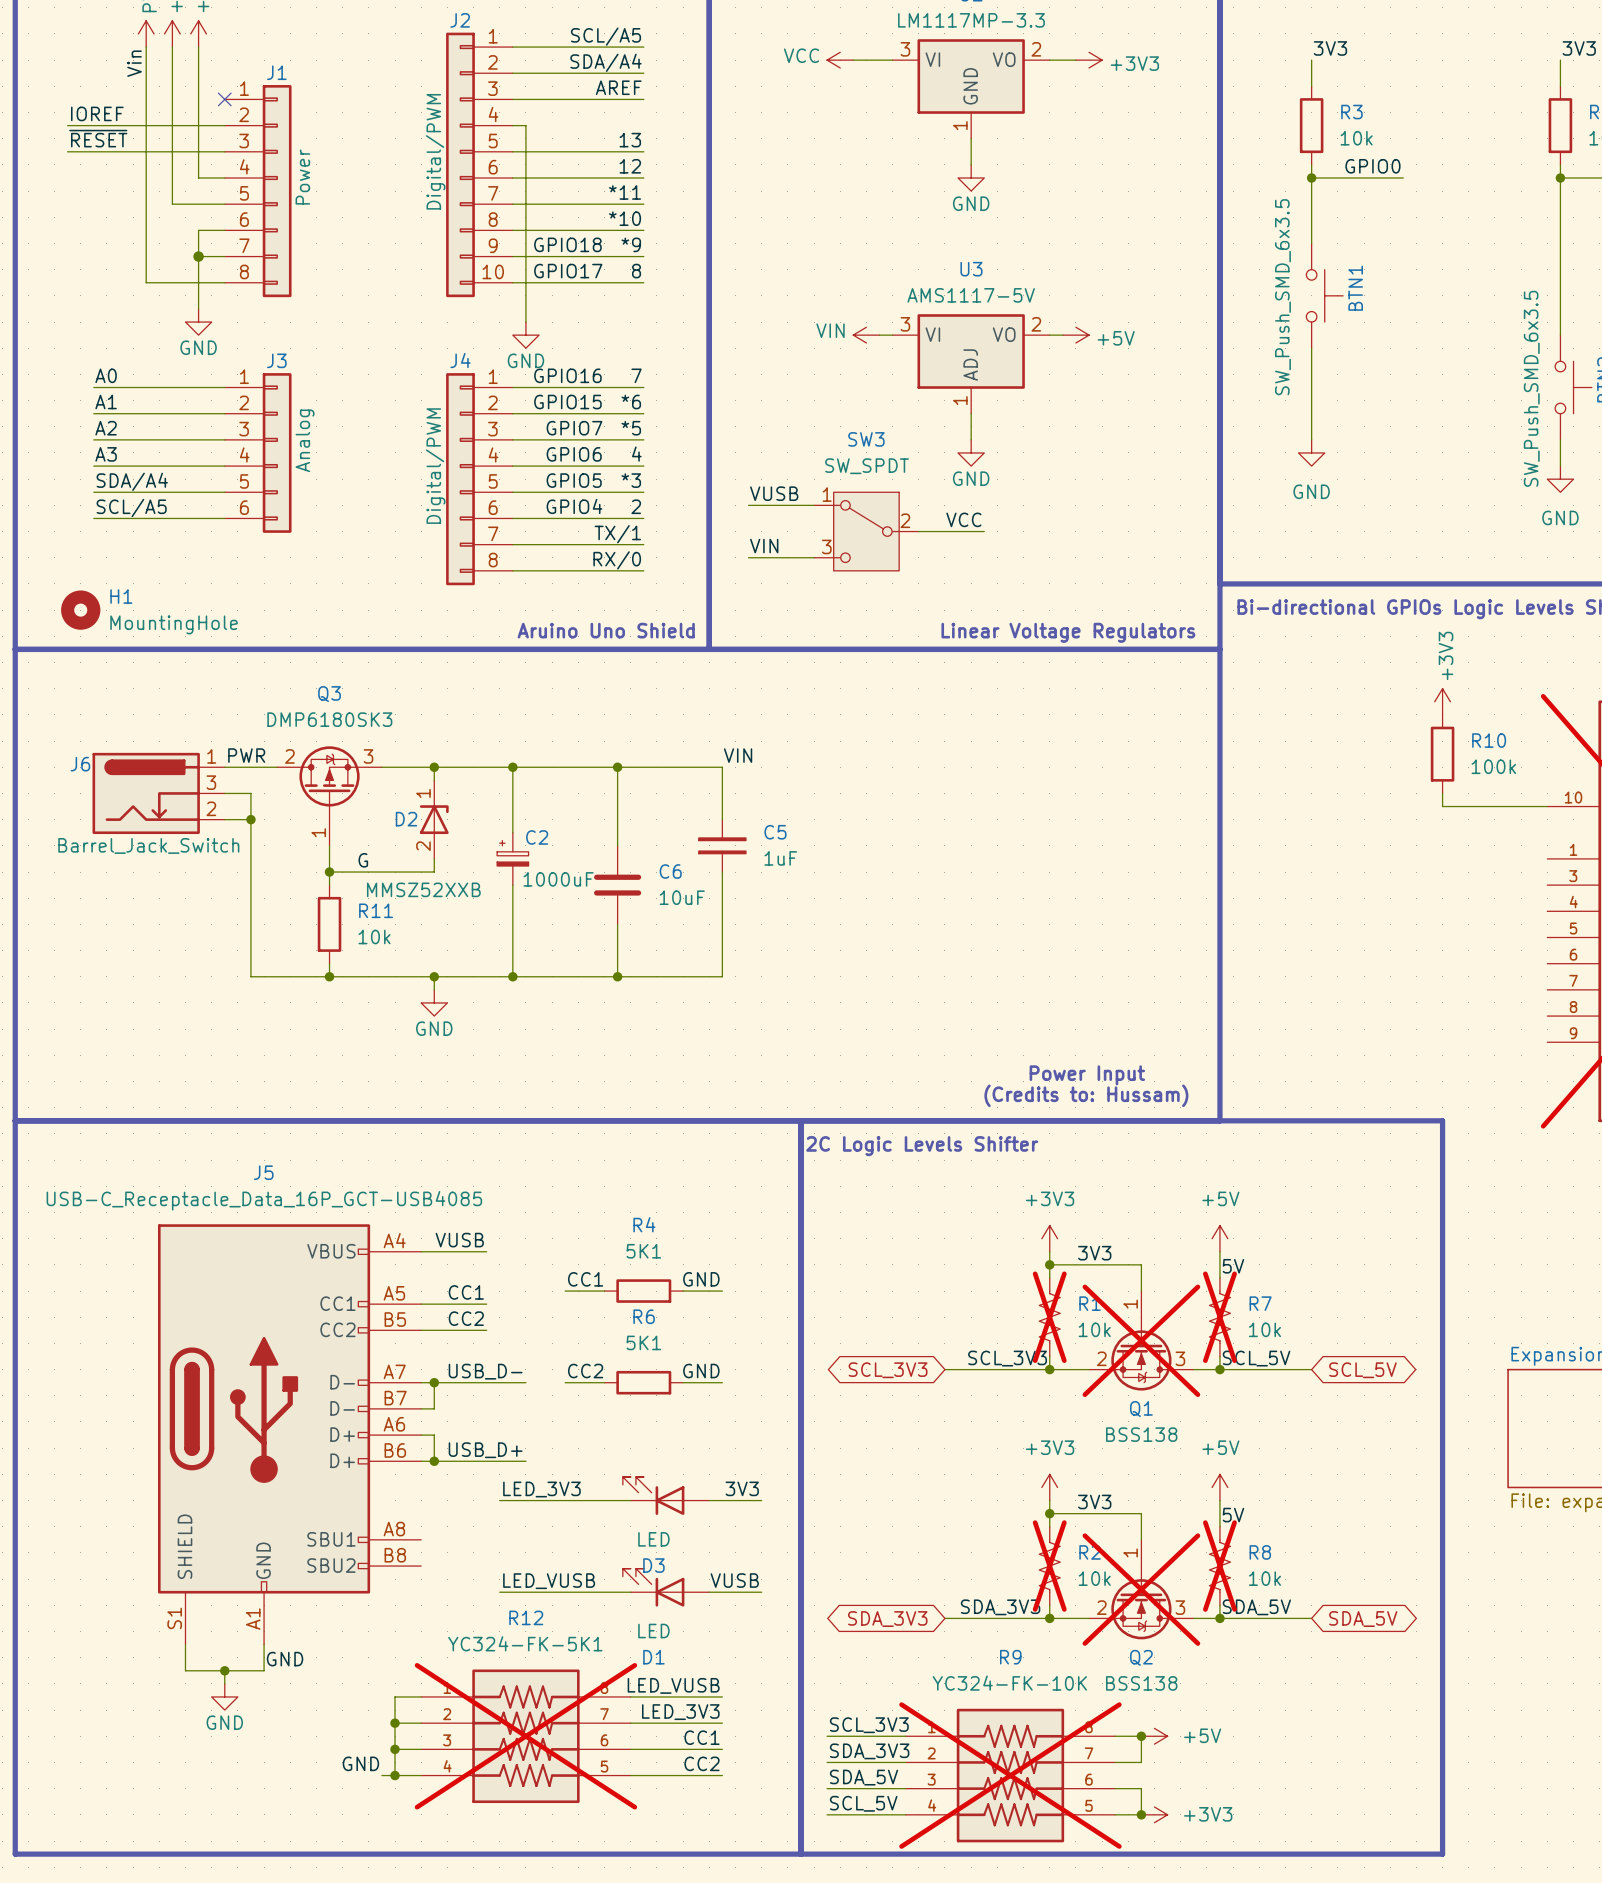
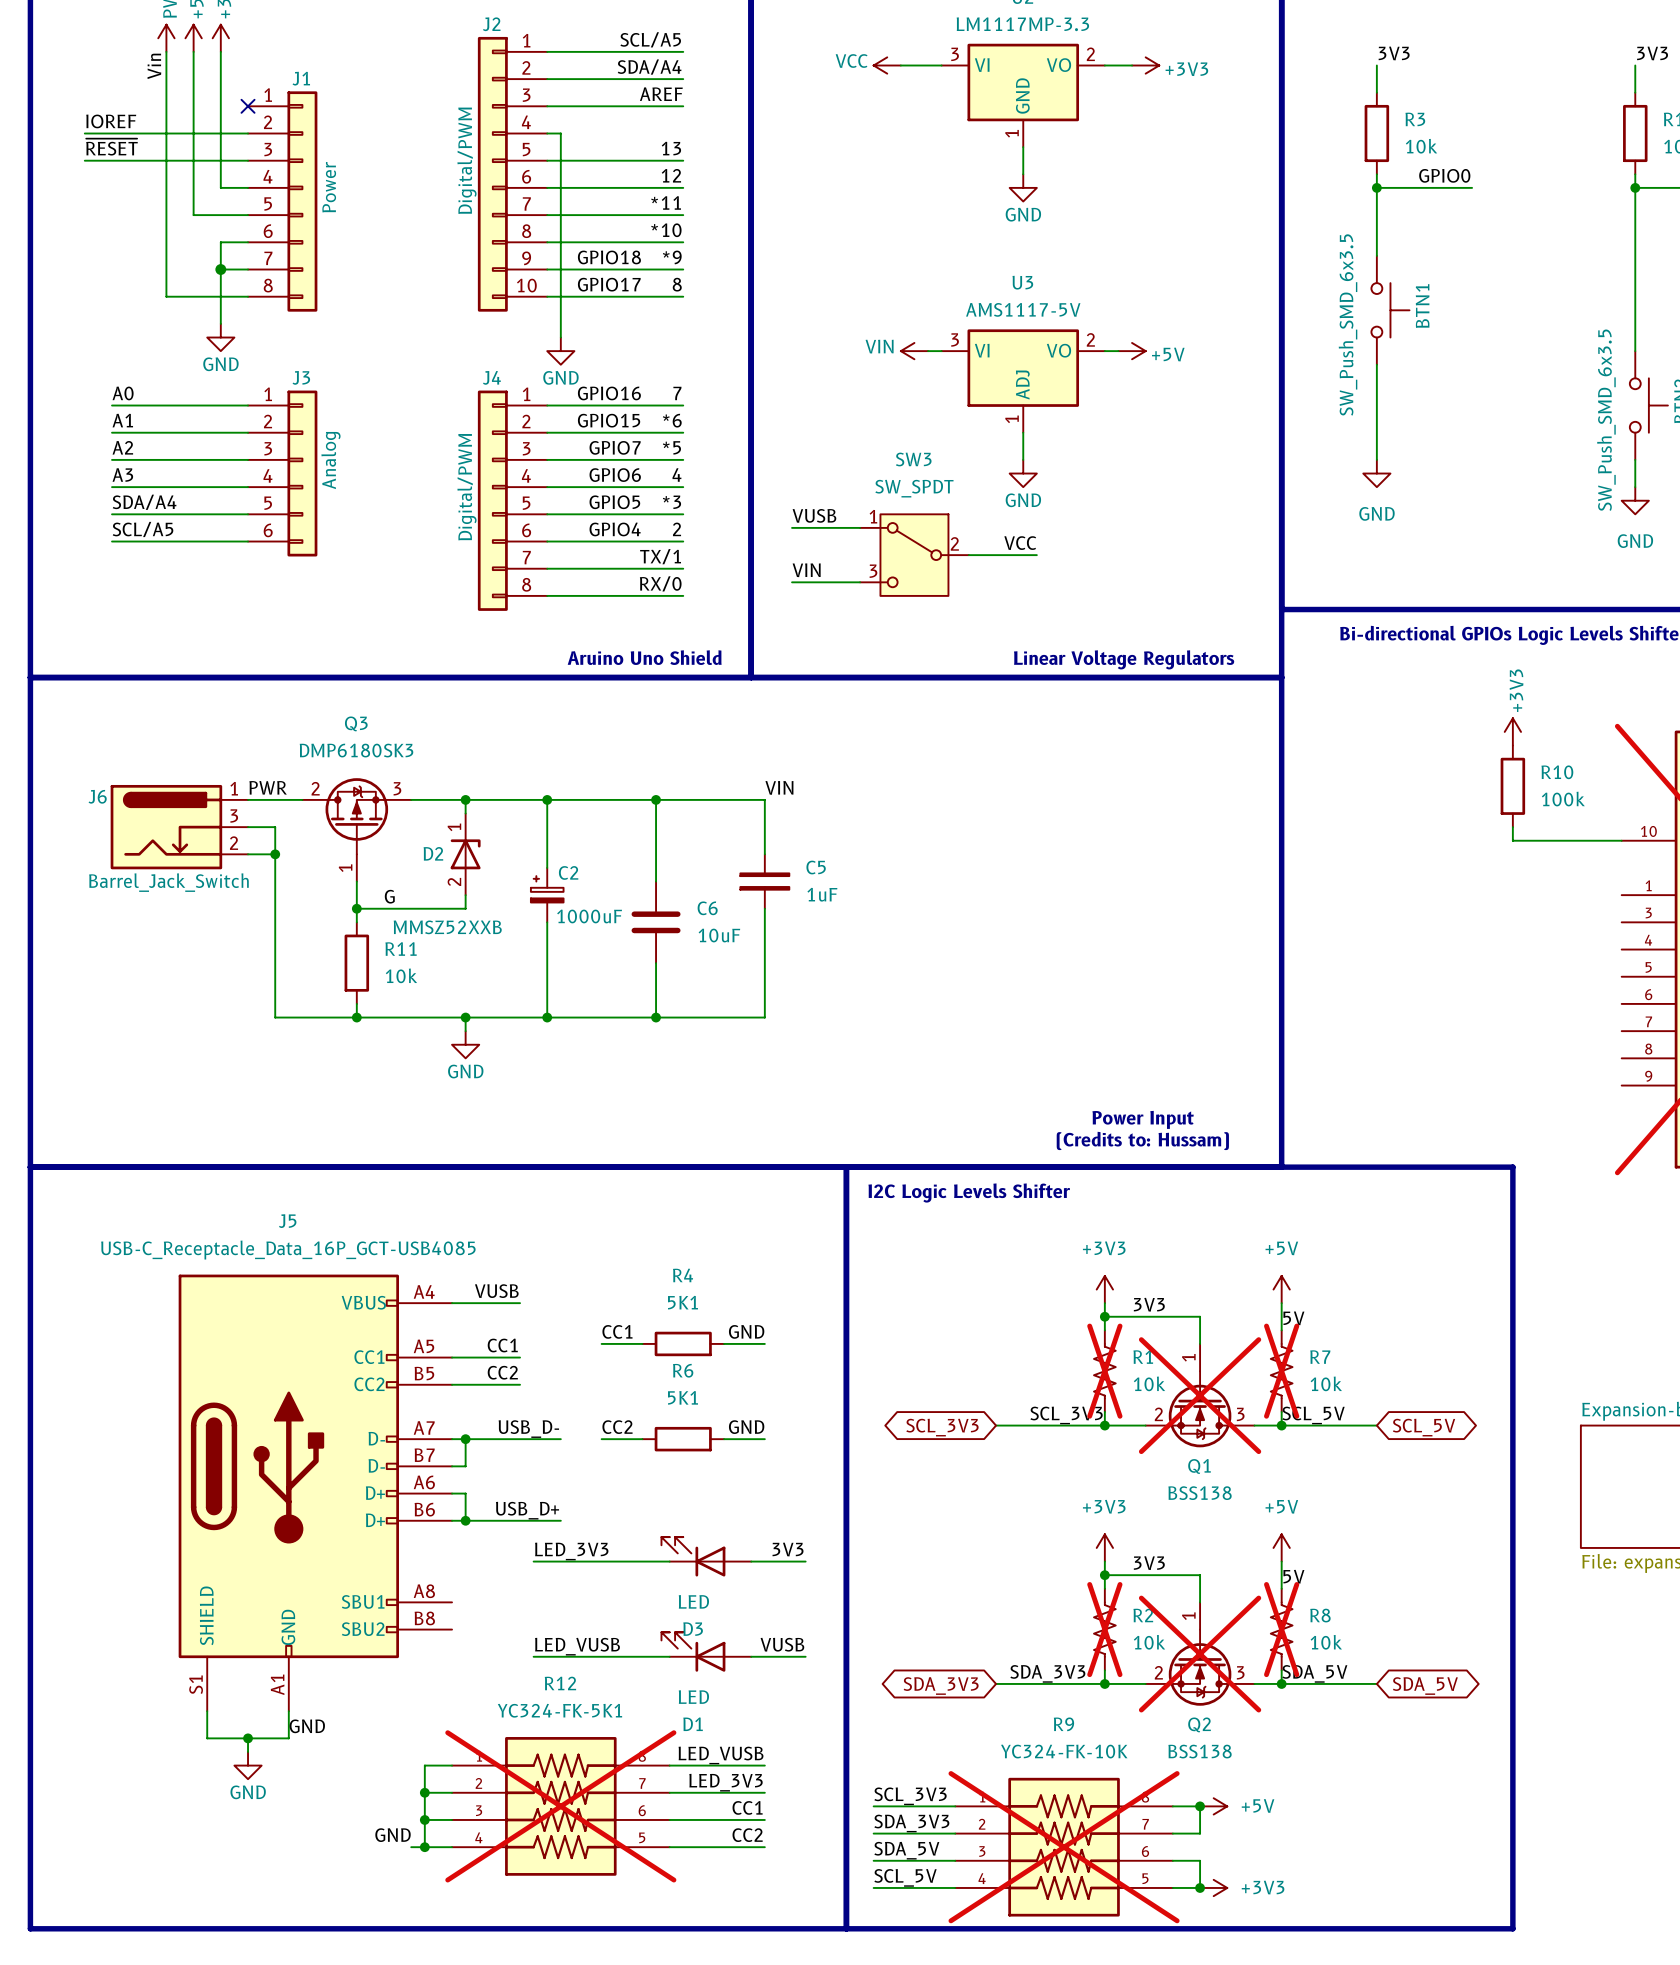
H1: MountingHole (80, 610) -> none

